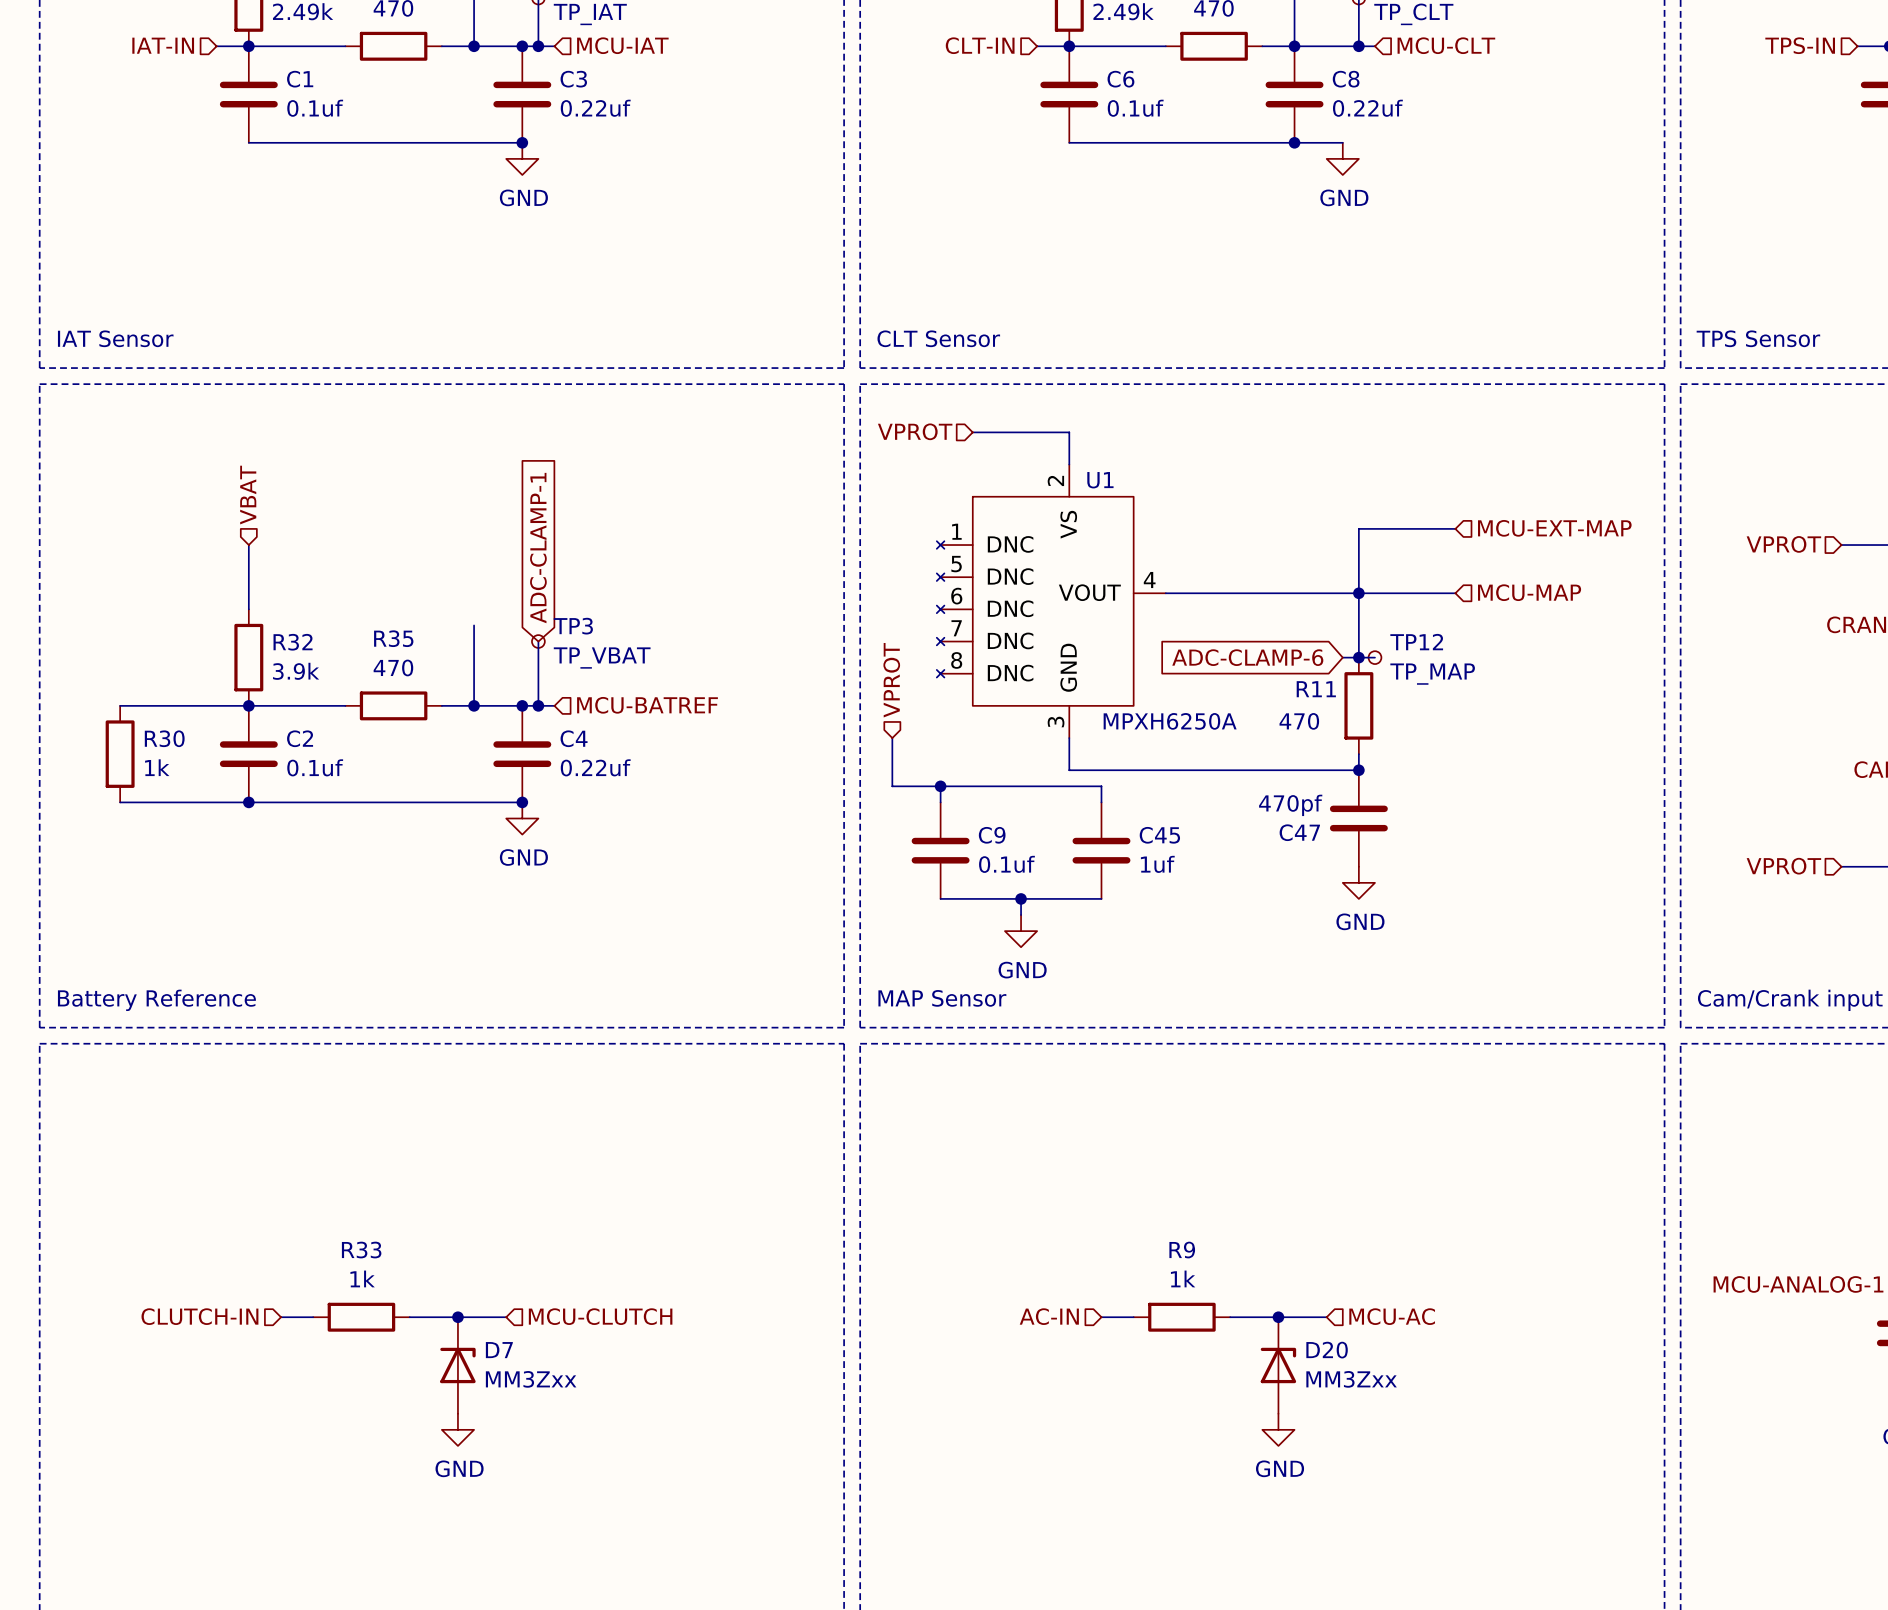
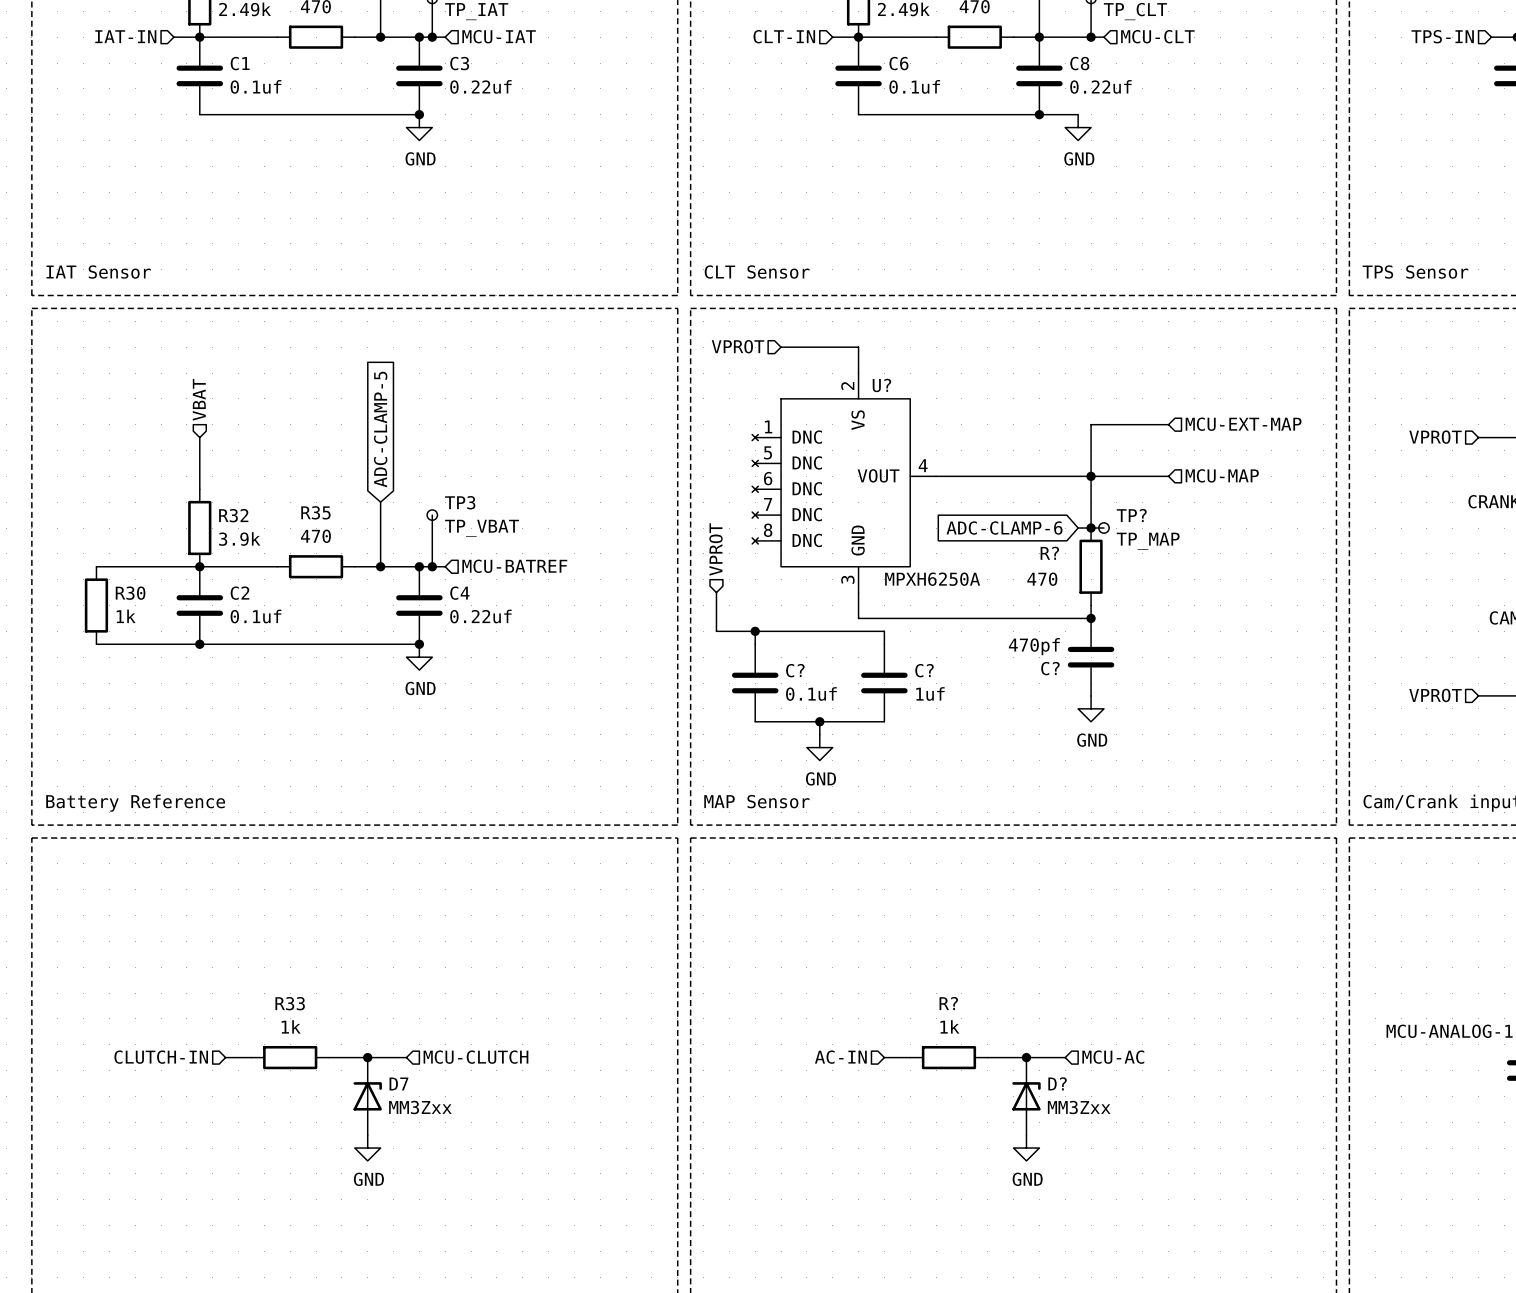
U1 name: U1 (1100, 480) -> U? (881, 385)
global label: none -> ADC-CLAMP-5 (380, 429)
global label: ADC-CLAMP-1 (538, 548) -> none
TP12 name: TP12 (1416, 642) -> TP? (1131, 515)
R11 name: R11 (1316, 689) -> R? (1049, 553)
C47 name: C47 (1299, 832) -> C? (1050, 668)
C9 name: C9 (992, 835) -> C? (795, 670)
C45 name: C45 (1159, 835) -> C? (924, 670)
R9 name: R9 (1182, 1250) -> R? (948, 1003)
D20 name: D20 (1327, 1350) -> D? (1057, 1083)

